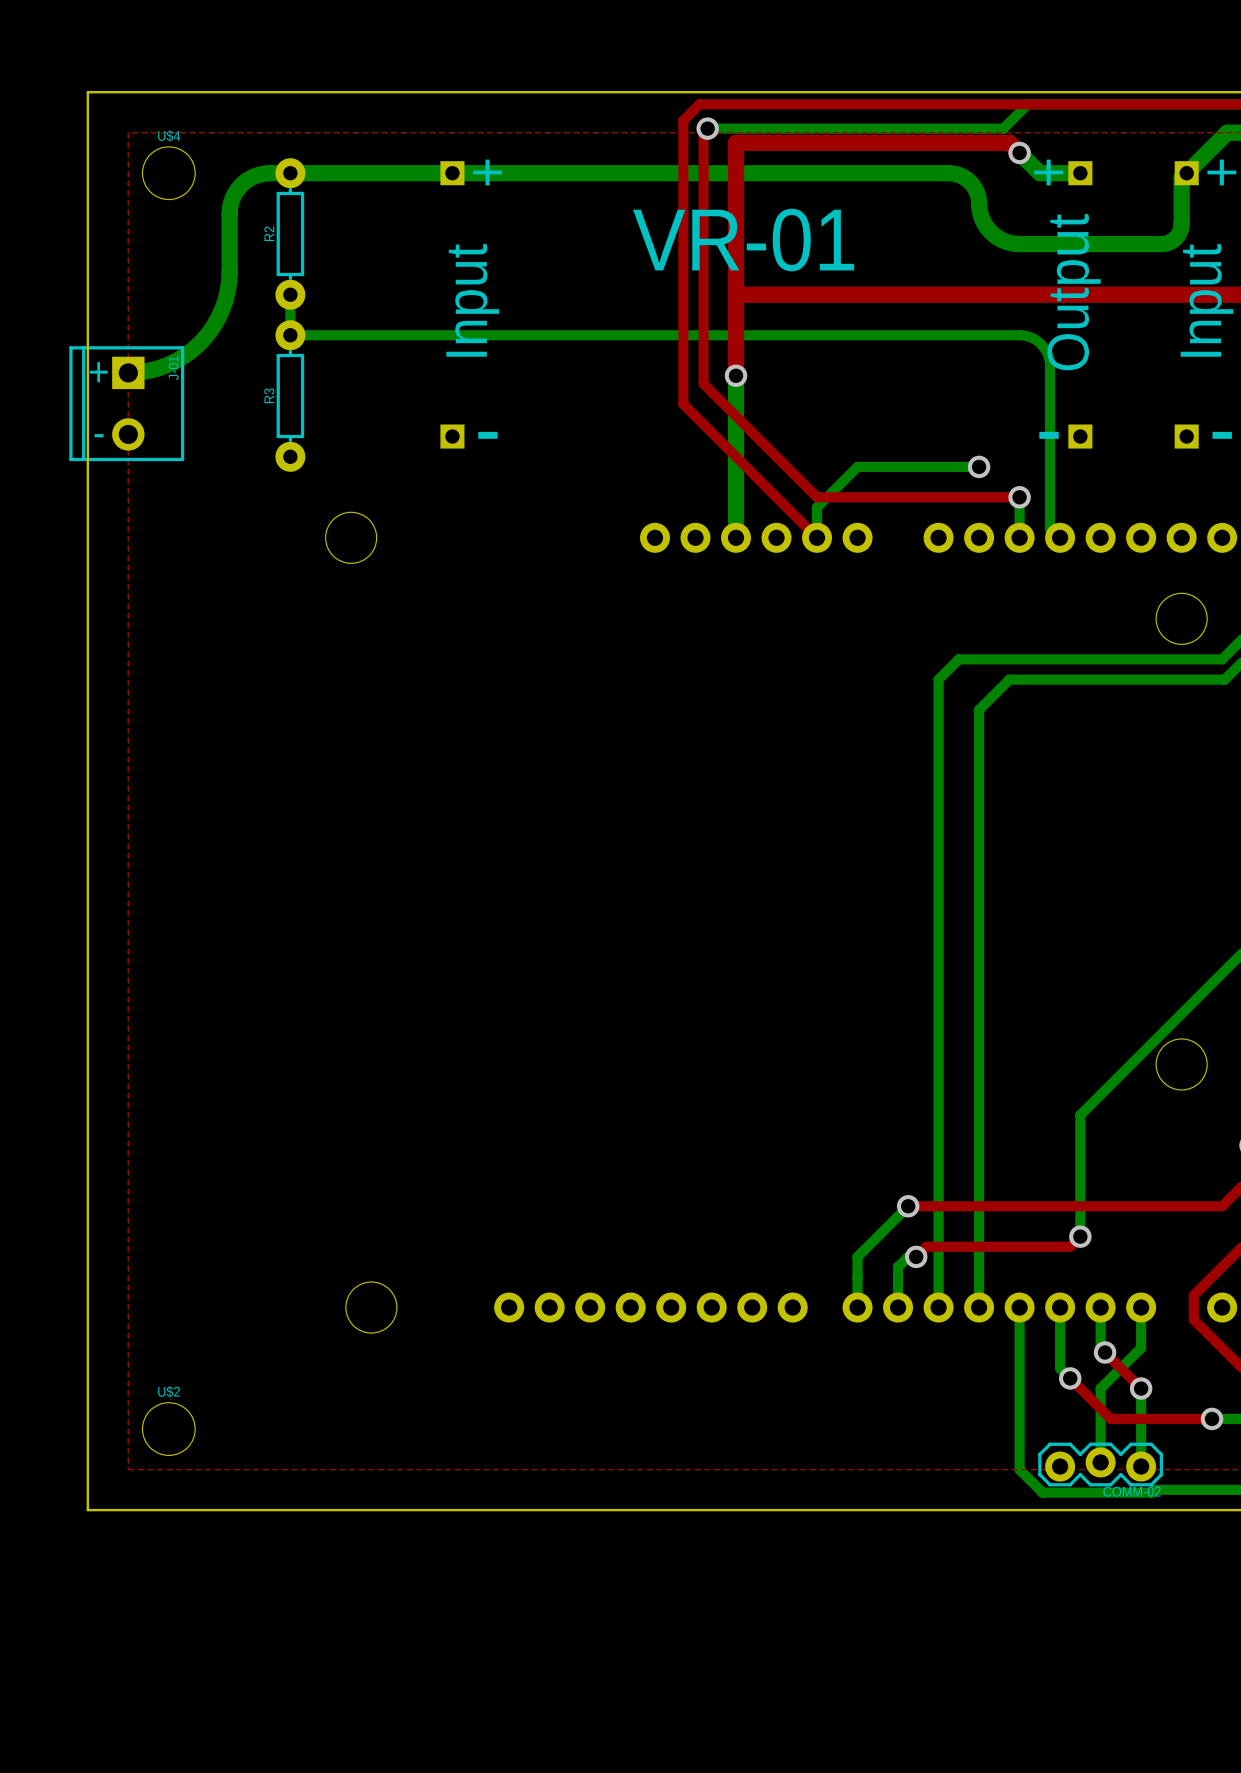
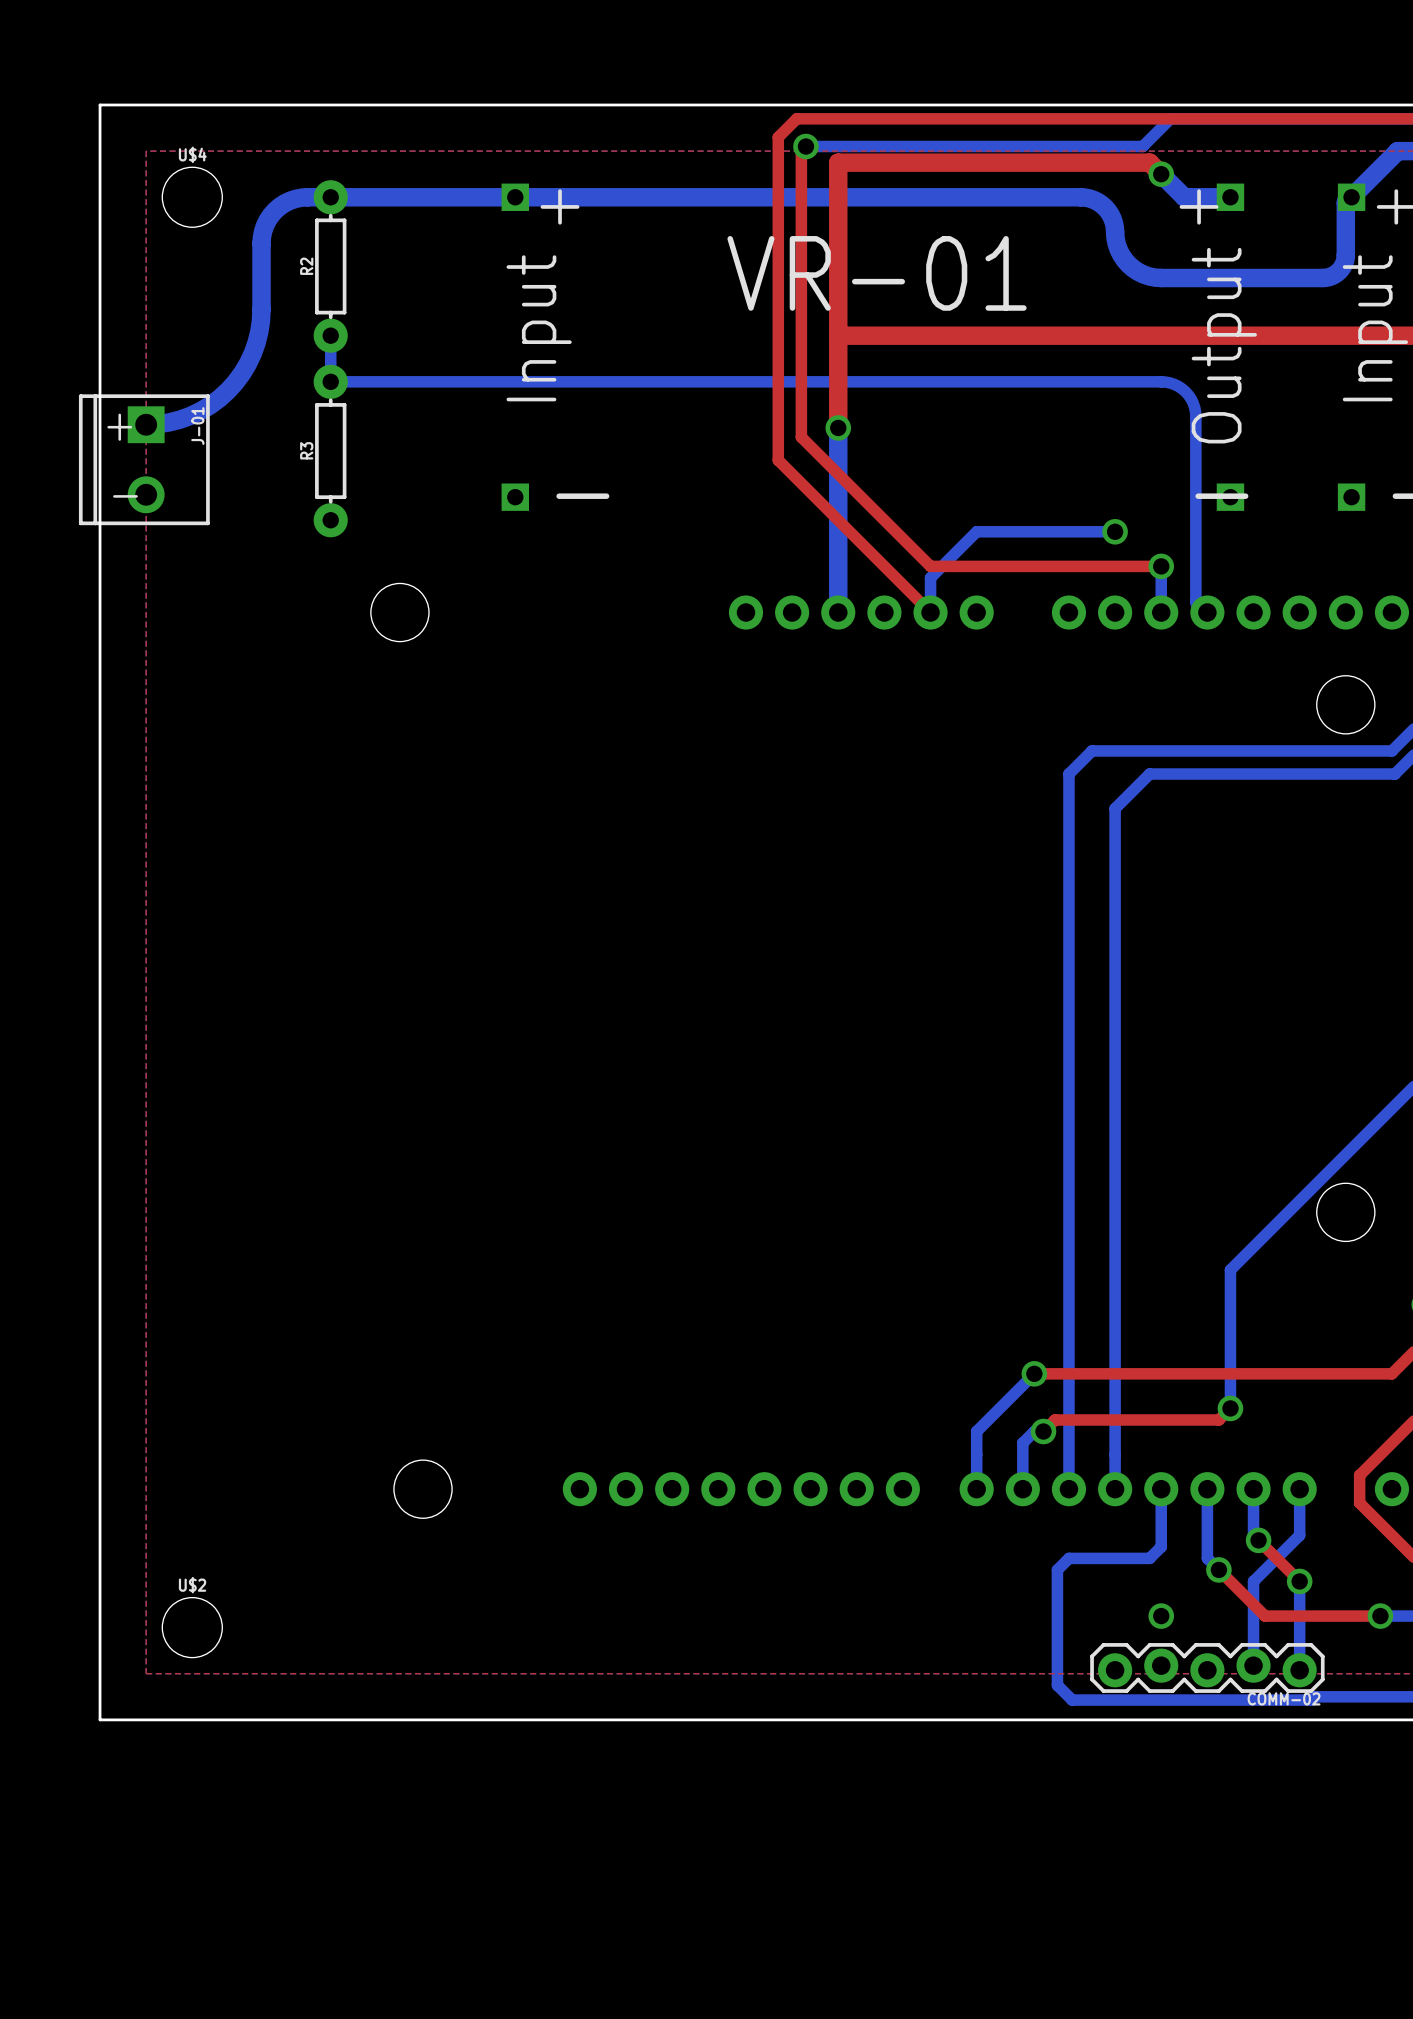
bottom track: (1019, 1358) (1019, 1469) (1042, 1492) -> (1161, 1546) (1149, 1558) (1068, 1558) (1057, 1569) (1057, 1685) (1072, 1700) (1187, 1700)
via: none -> (1161, 1616)
COMM-02 footprint: [1038, 1442, 1164, 1487] -> [1090, 1643, 1325, 1693]

